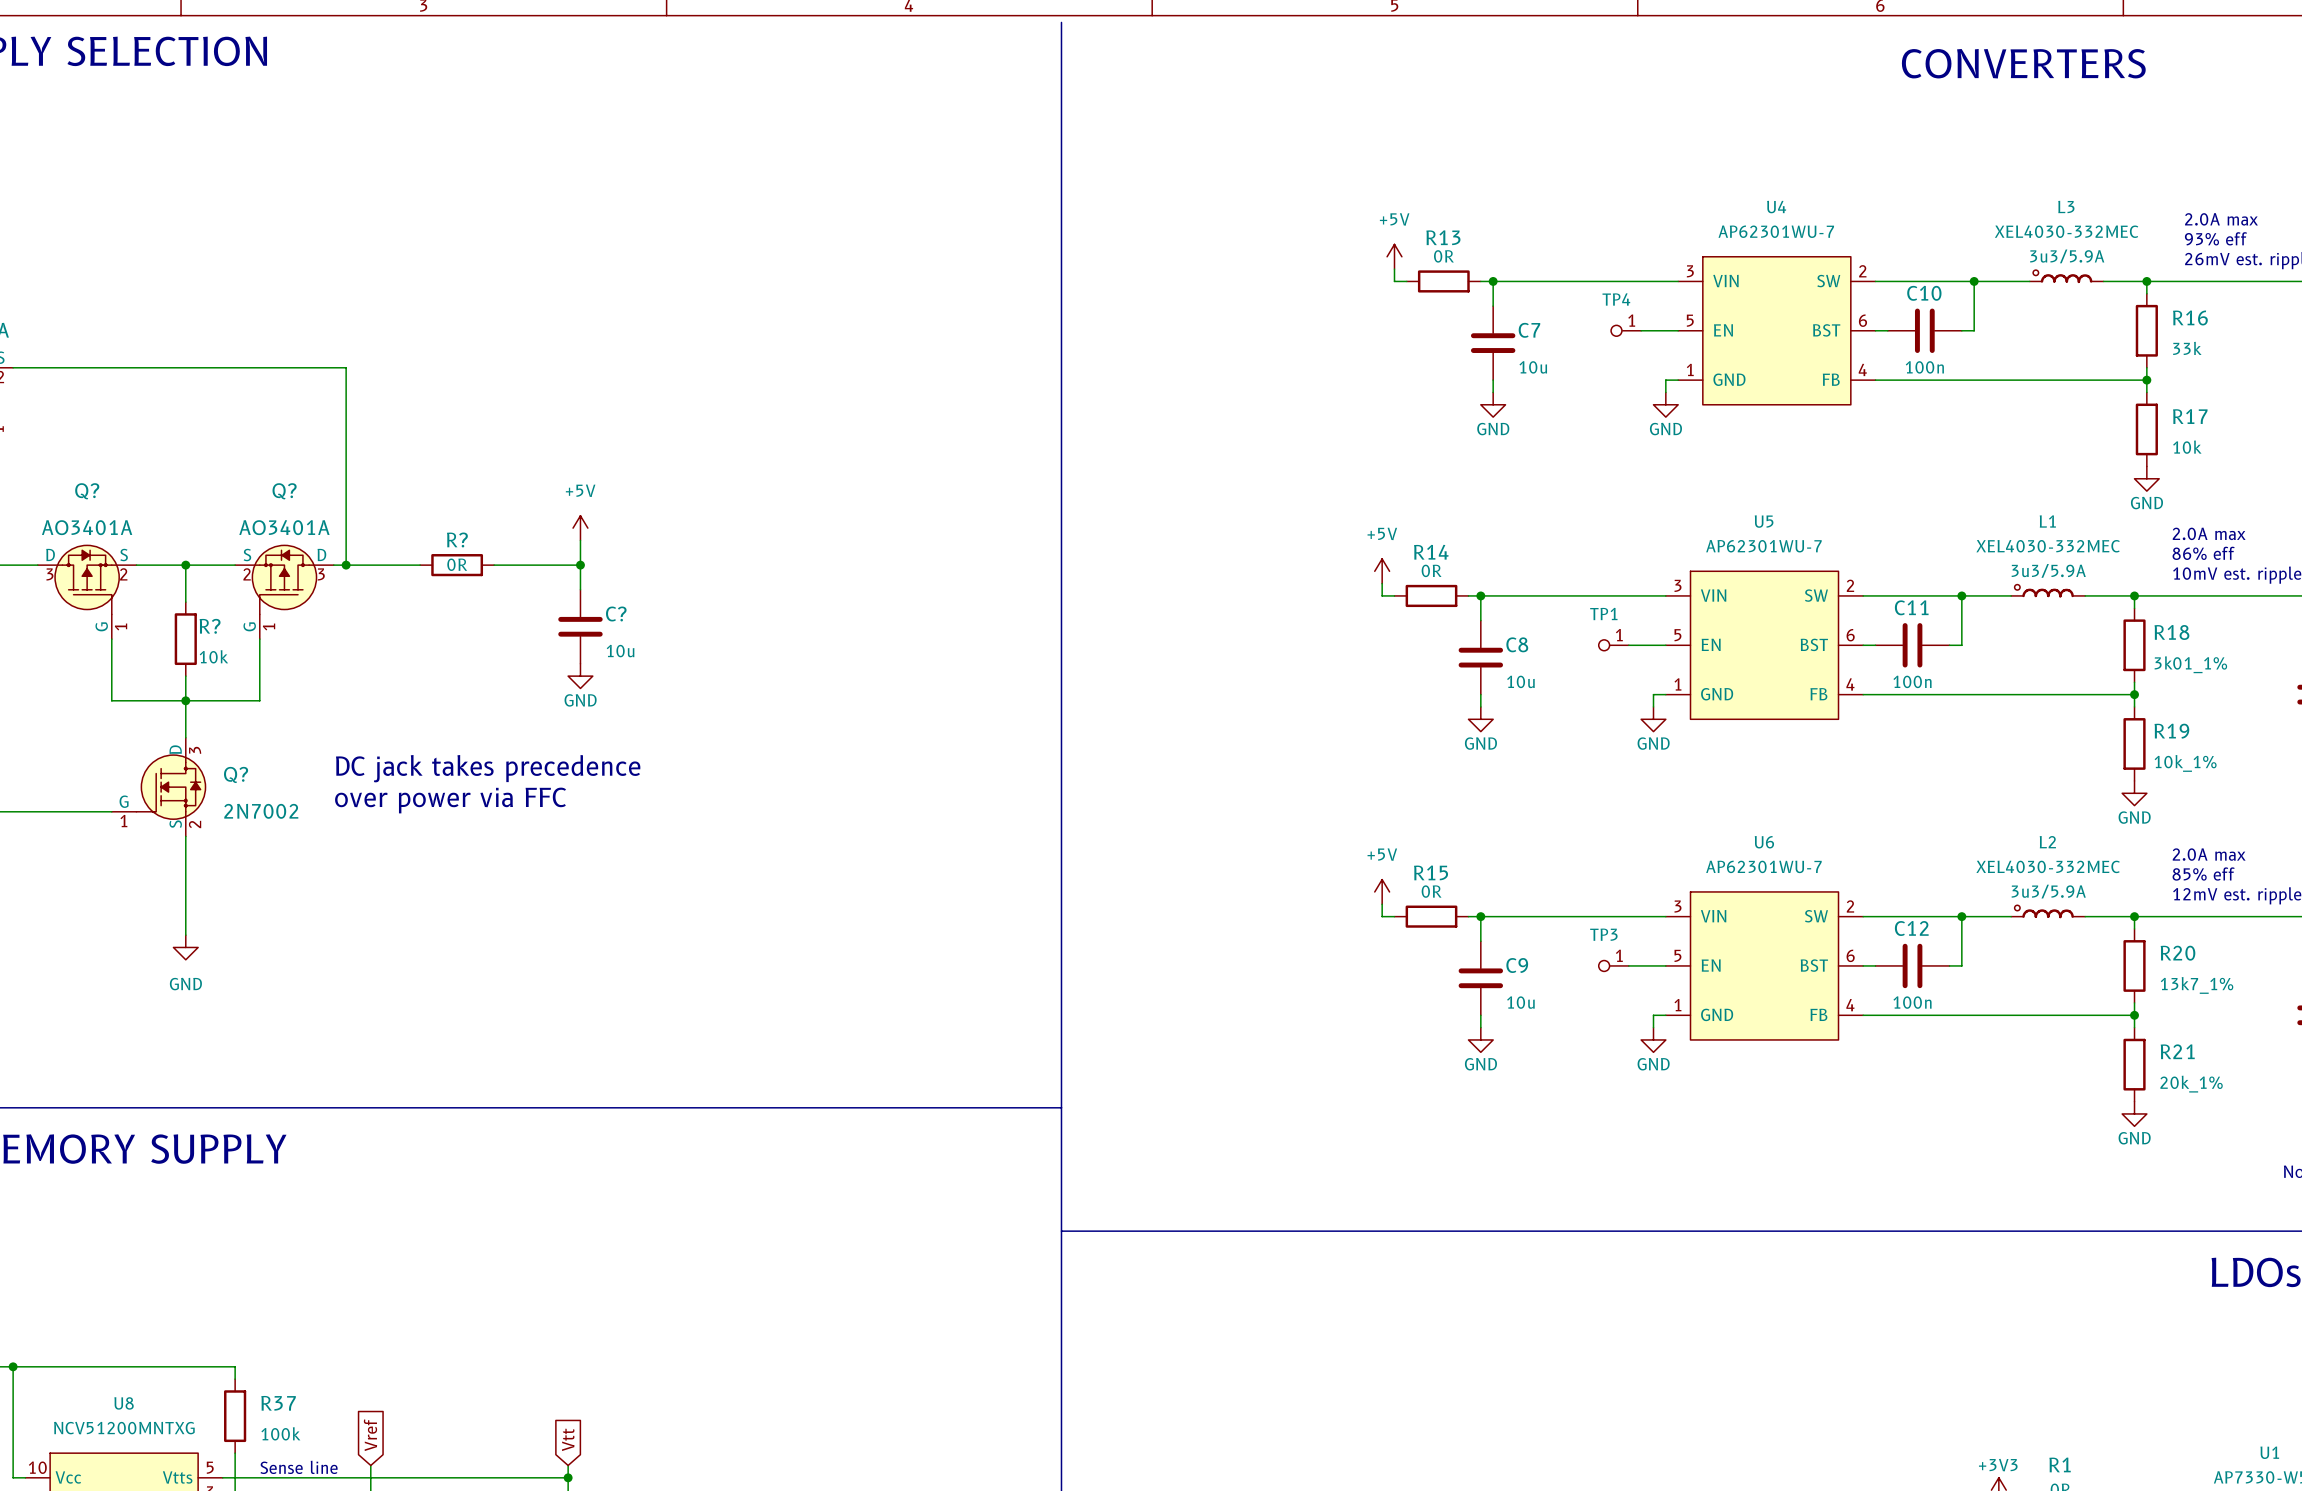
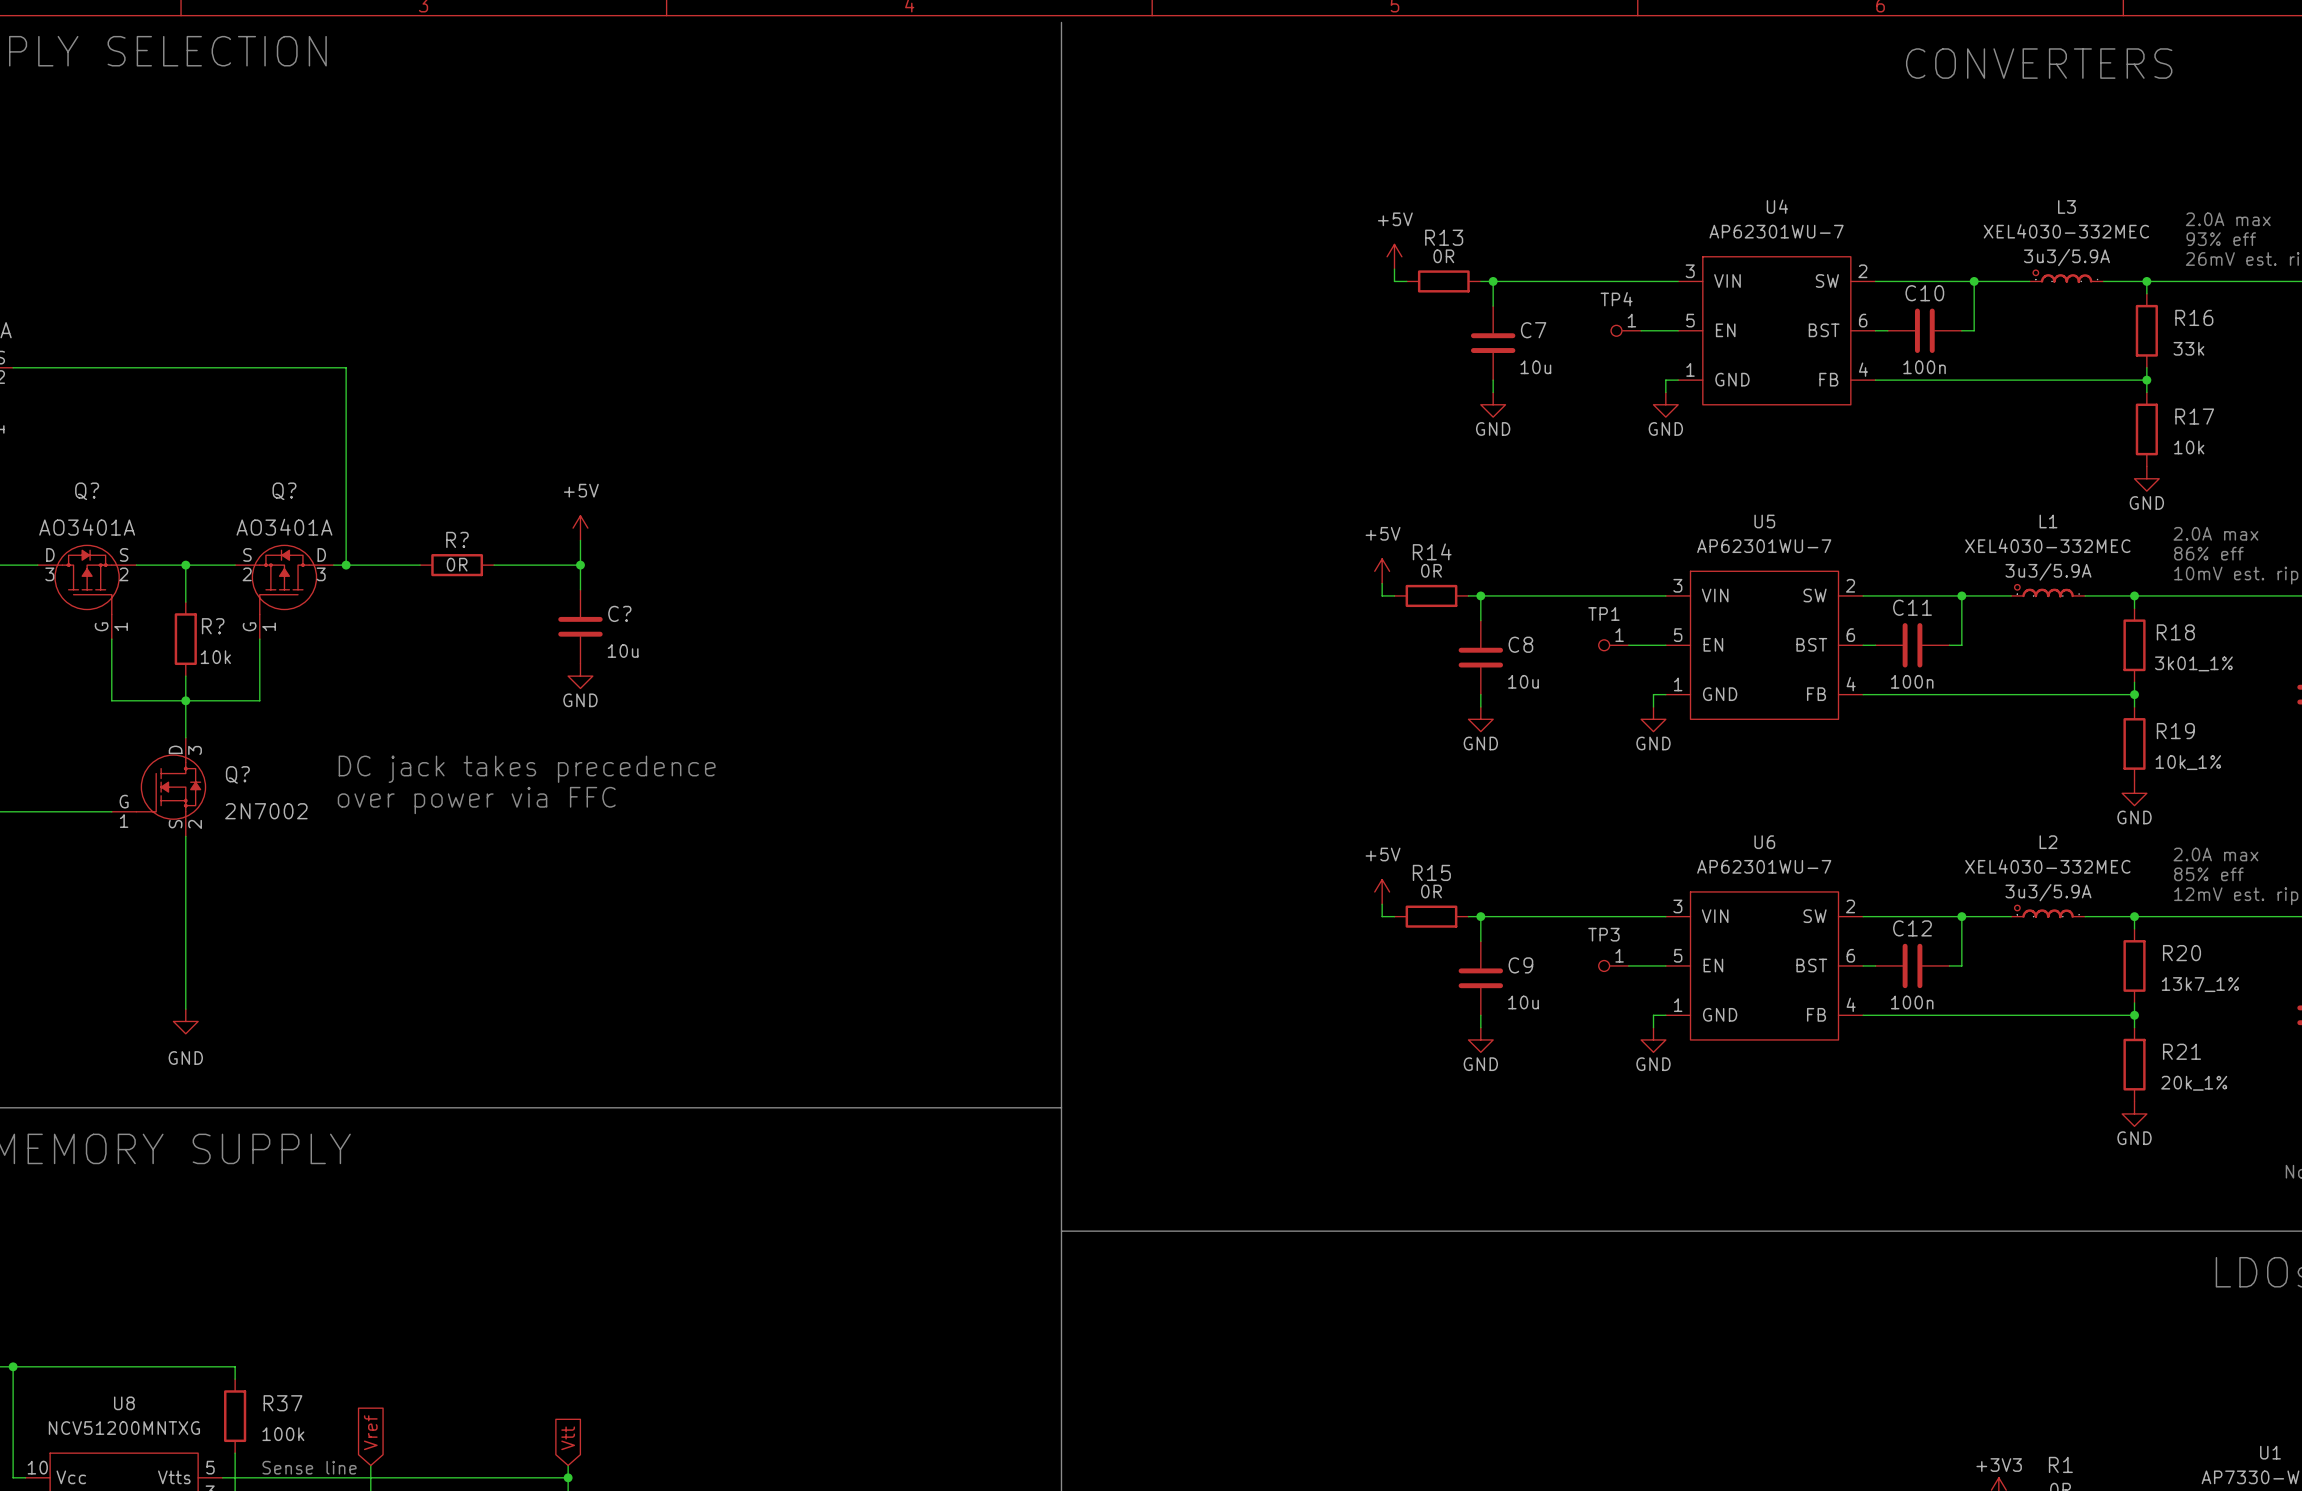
wire: none -> (185, 935) (185, 1009)
power symbol position: GND (185, 947) -> GND (185, 1021)

